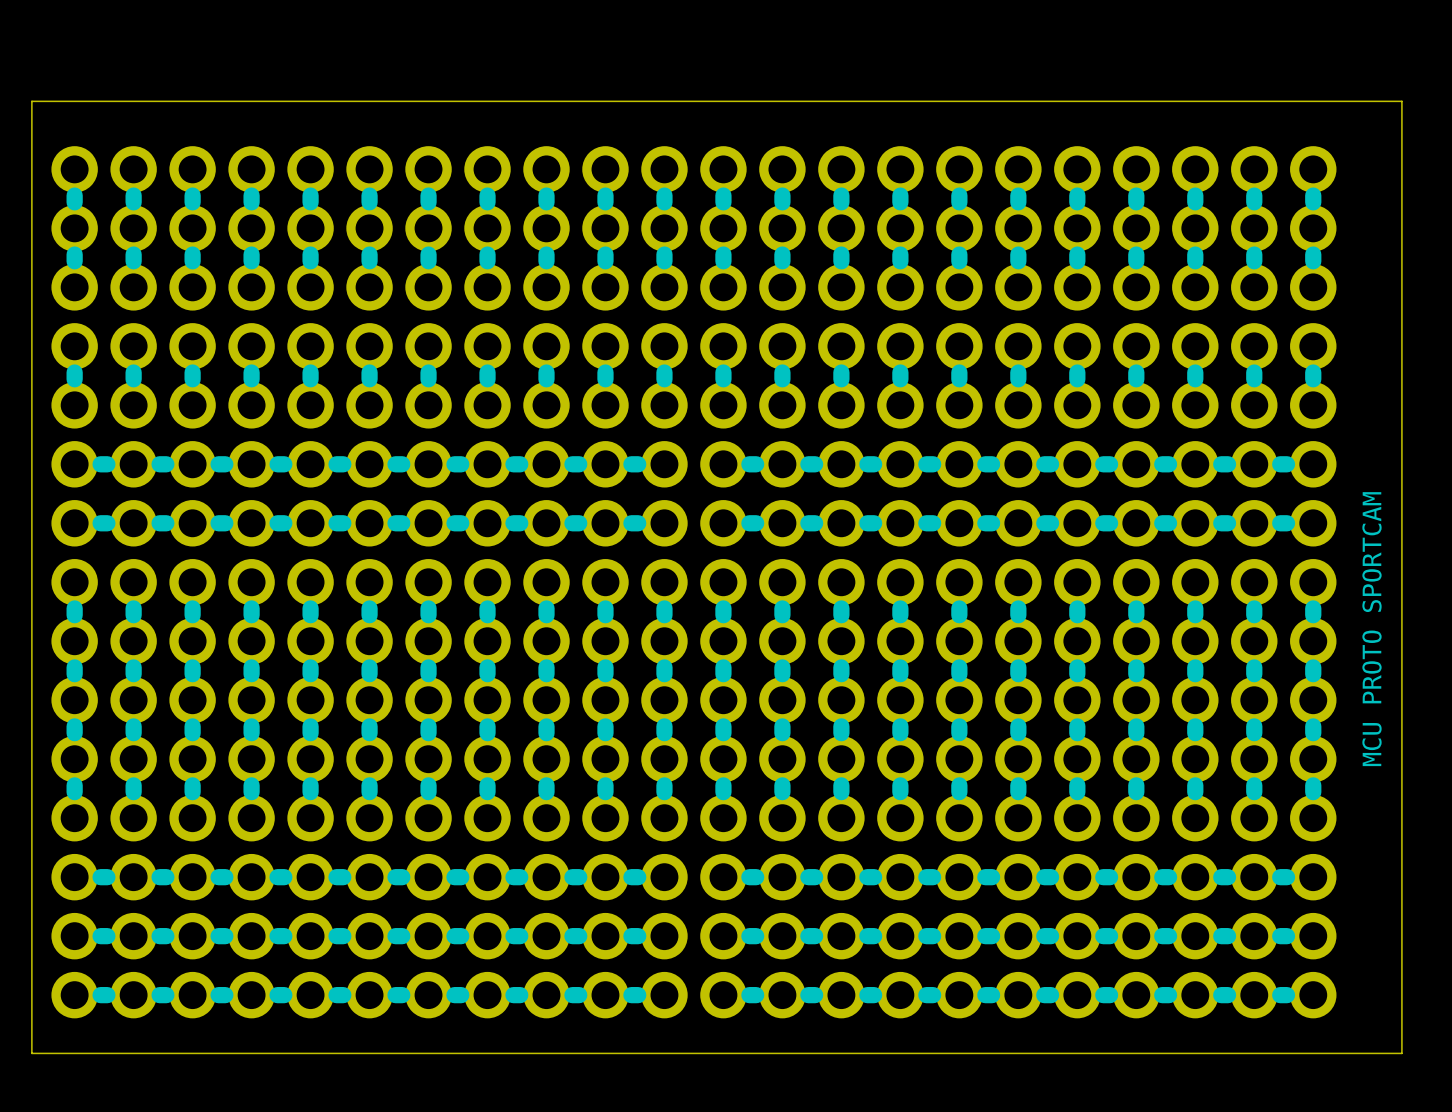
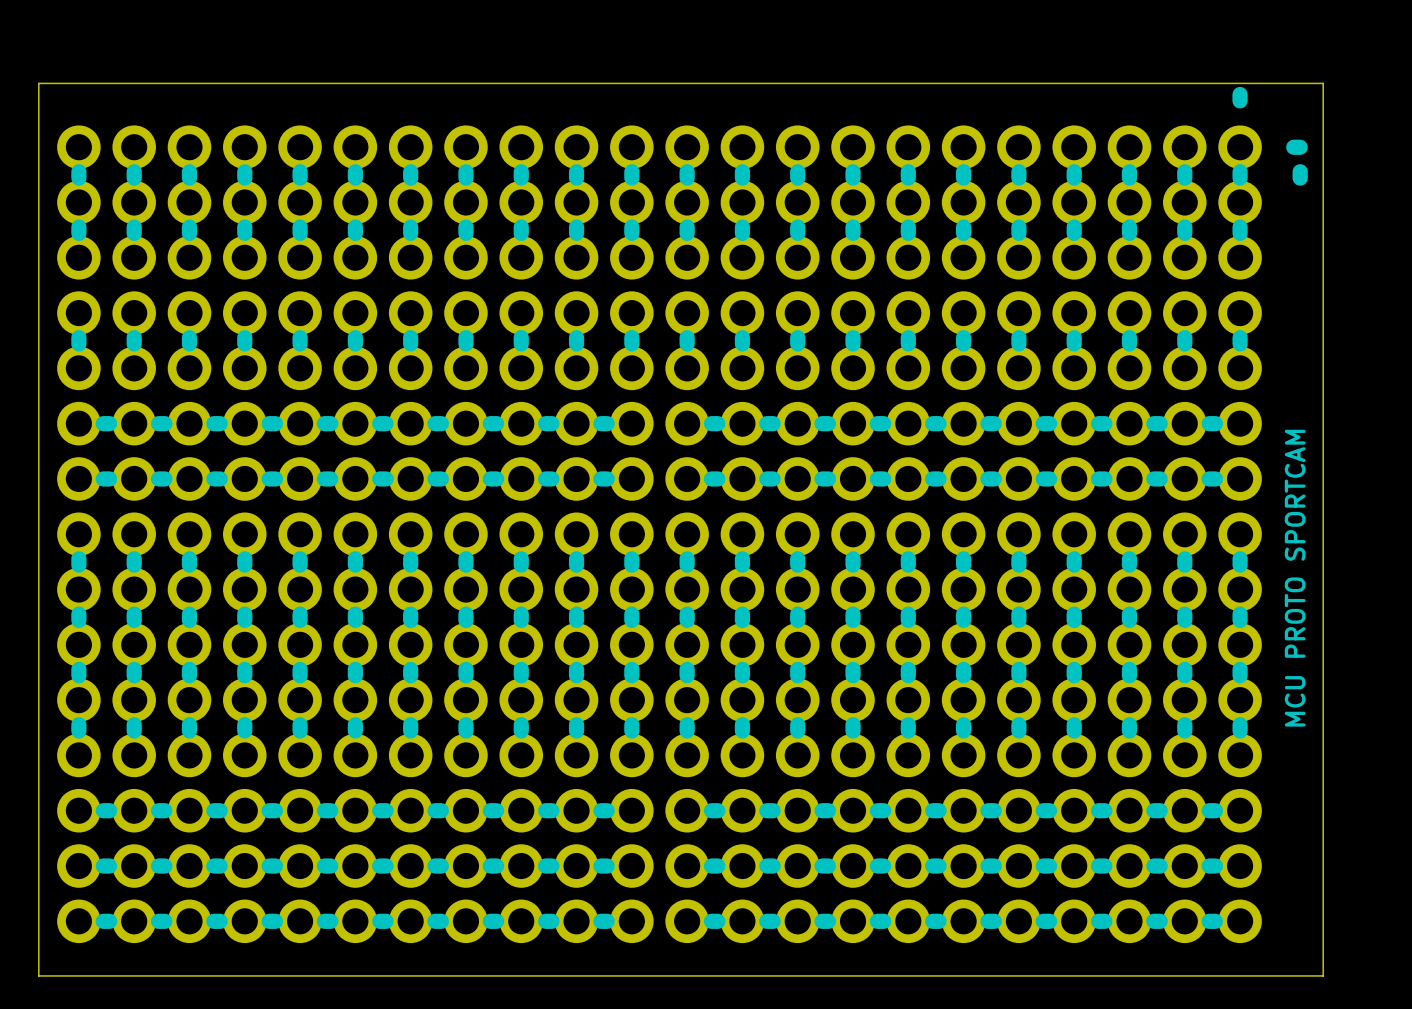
line: none -> (1240, 94) (1240, 100)
line: none -> (1293, 147) (1300, 147)
line: none -> (1300, 171) (1300, 178)

